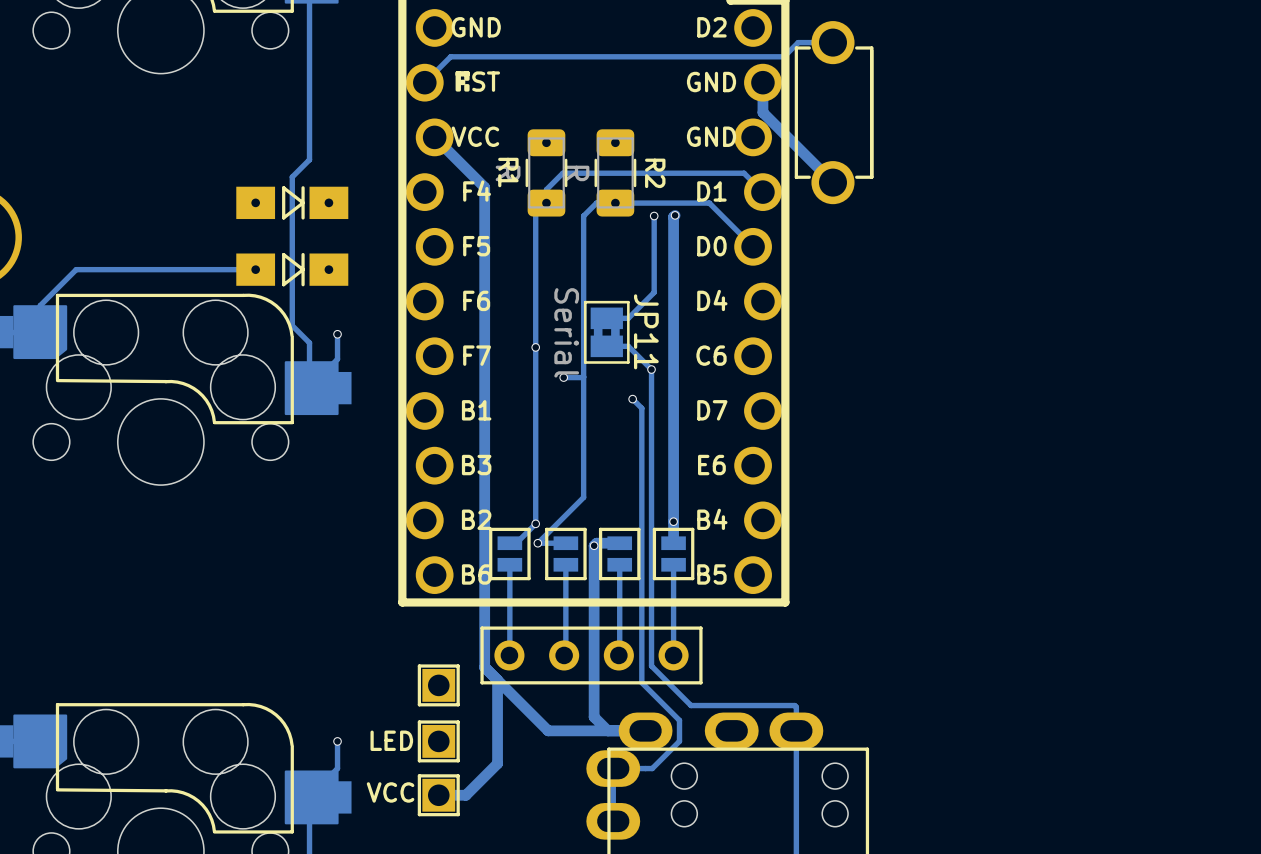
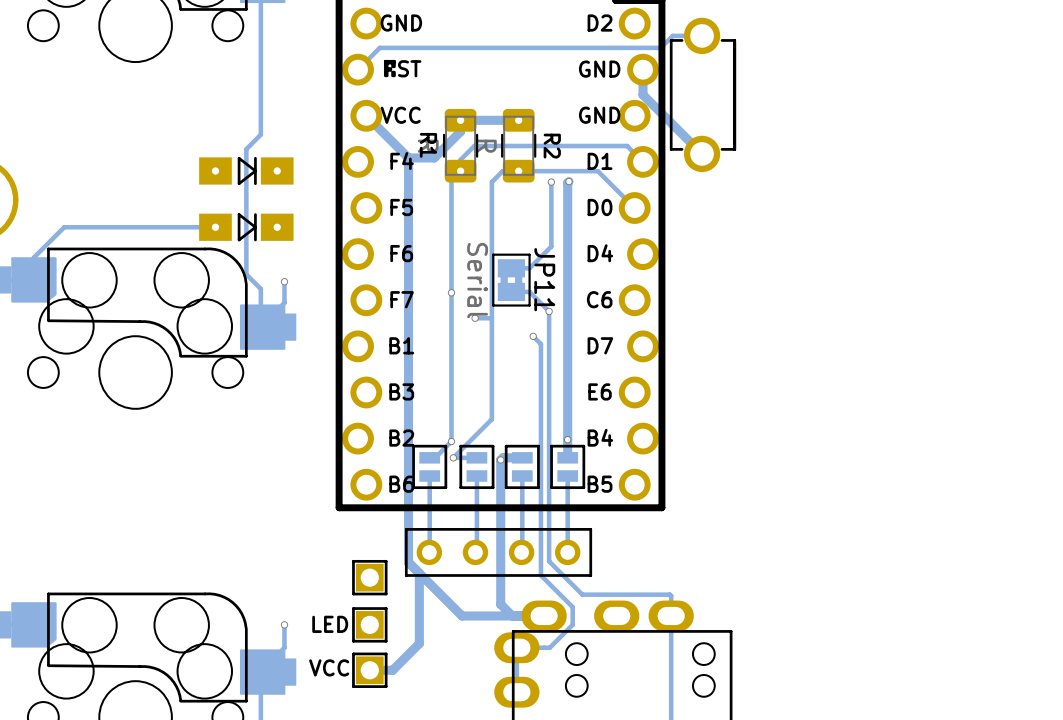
track: none -> (518, 120) (460, 120) (460, 131) (434, 157) (408, 157)

